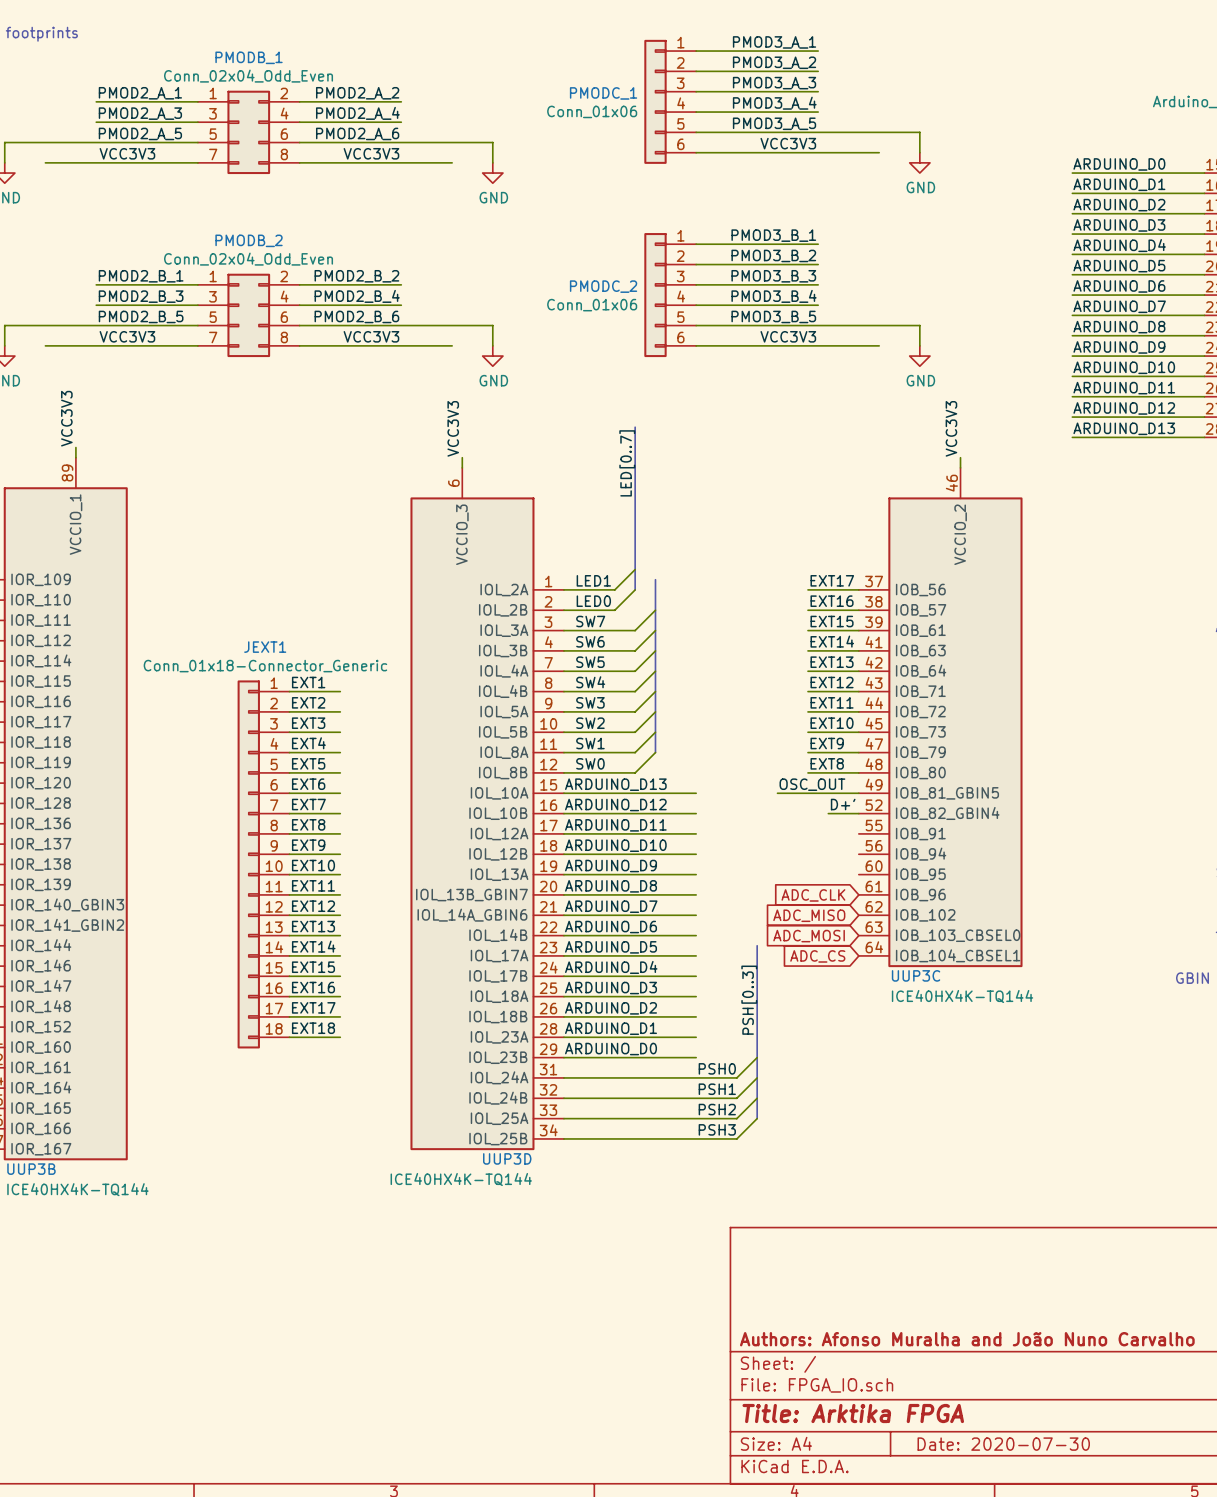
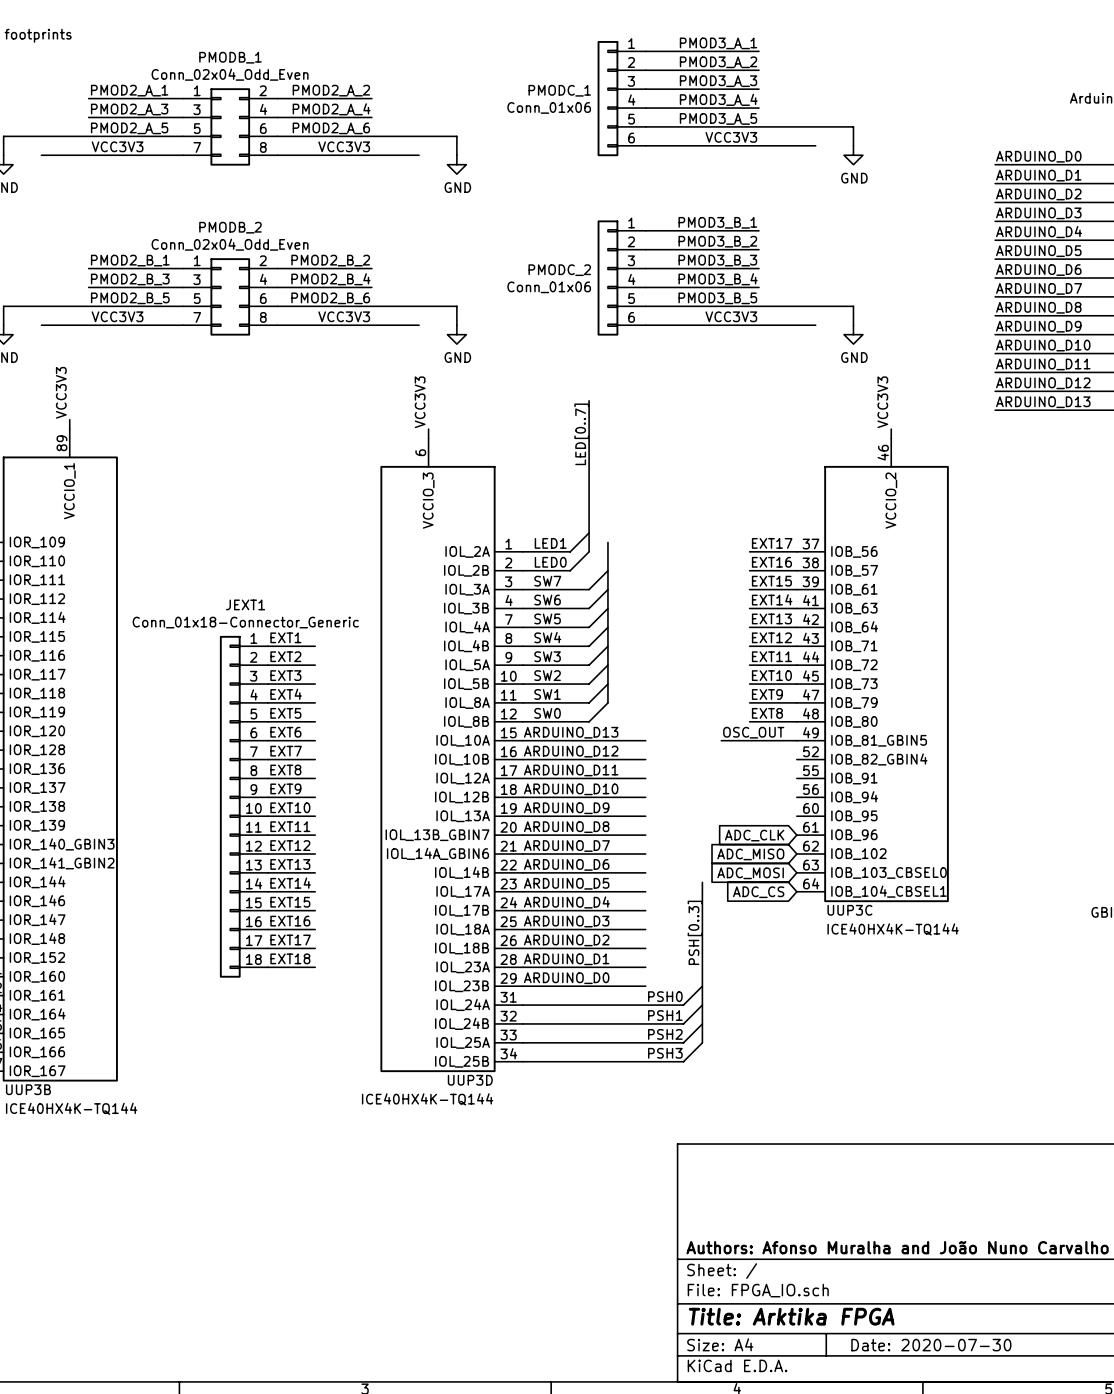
label: D+' (843, 804) -> none
wire: (828, 813) (858, 813) -> none

